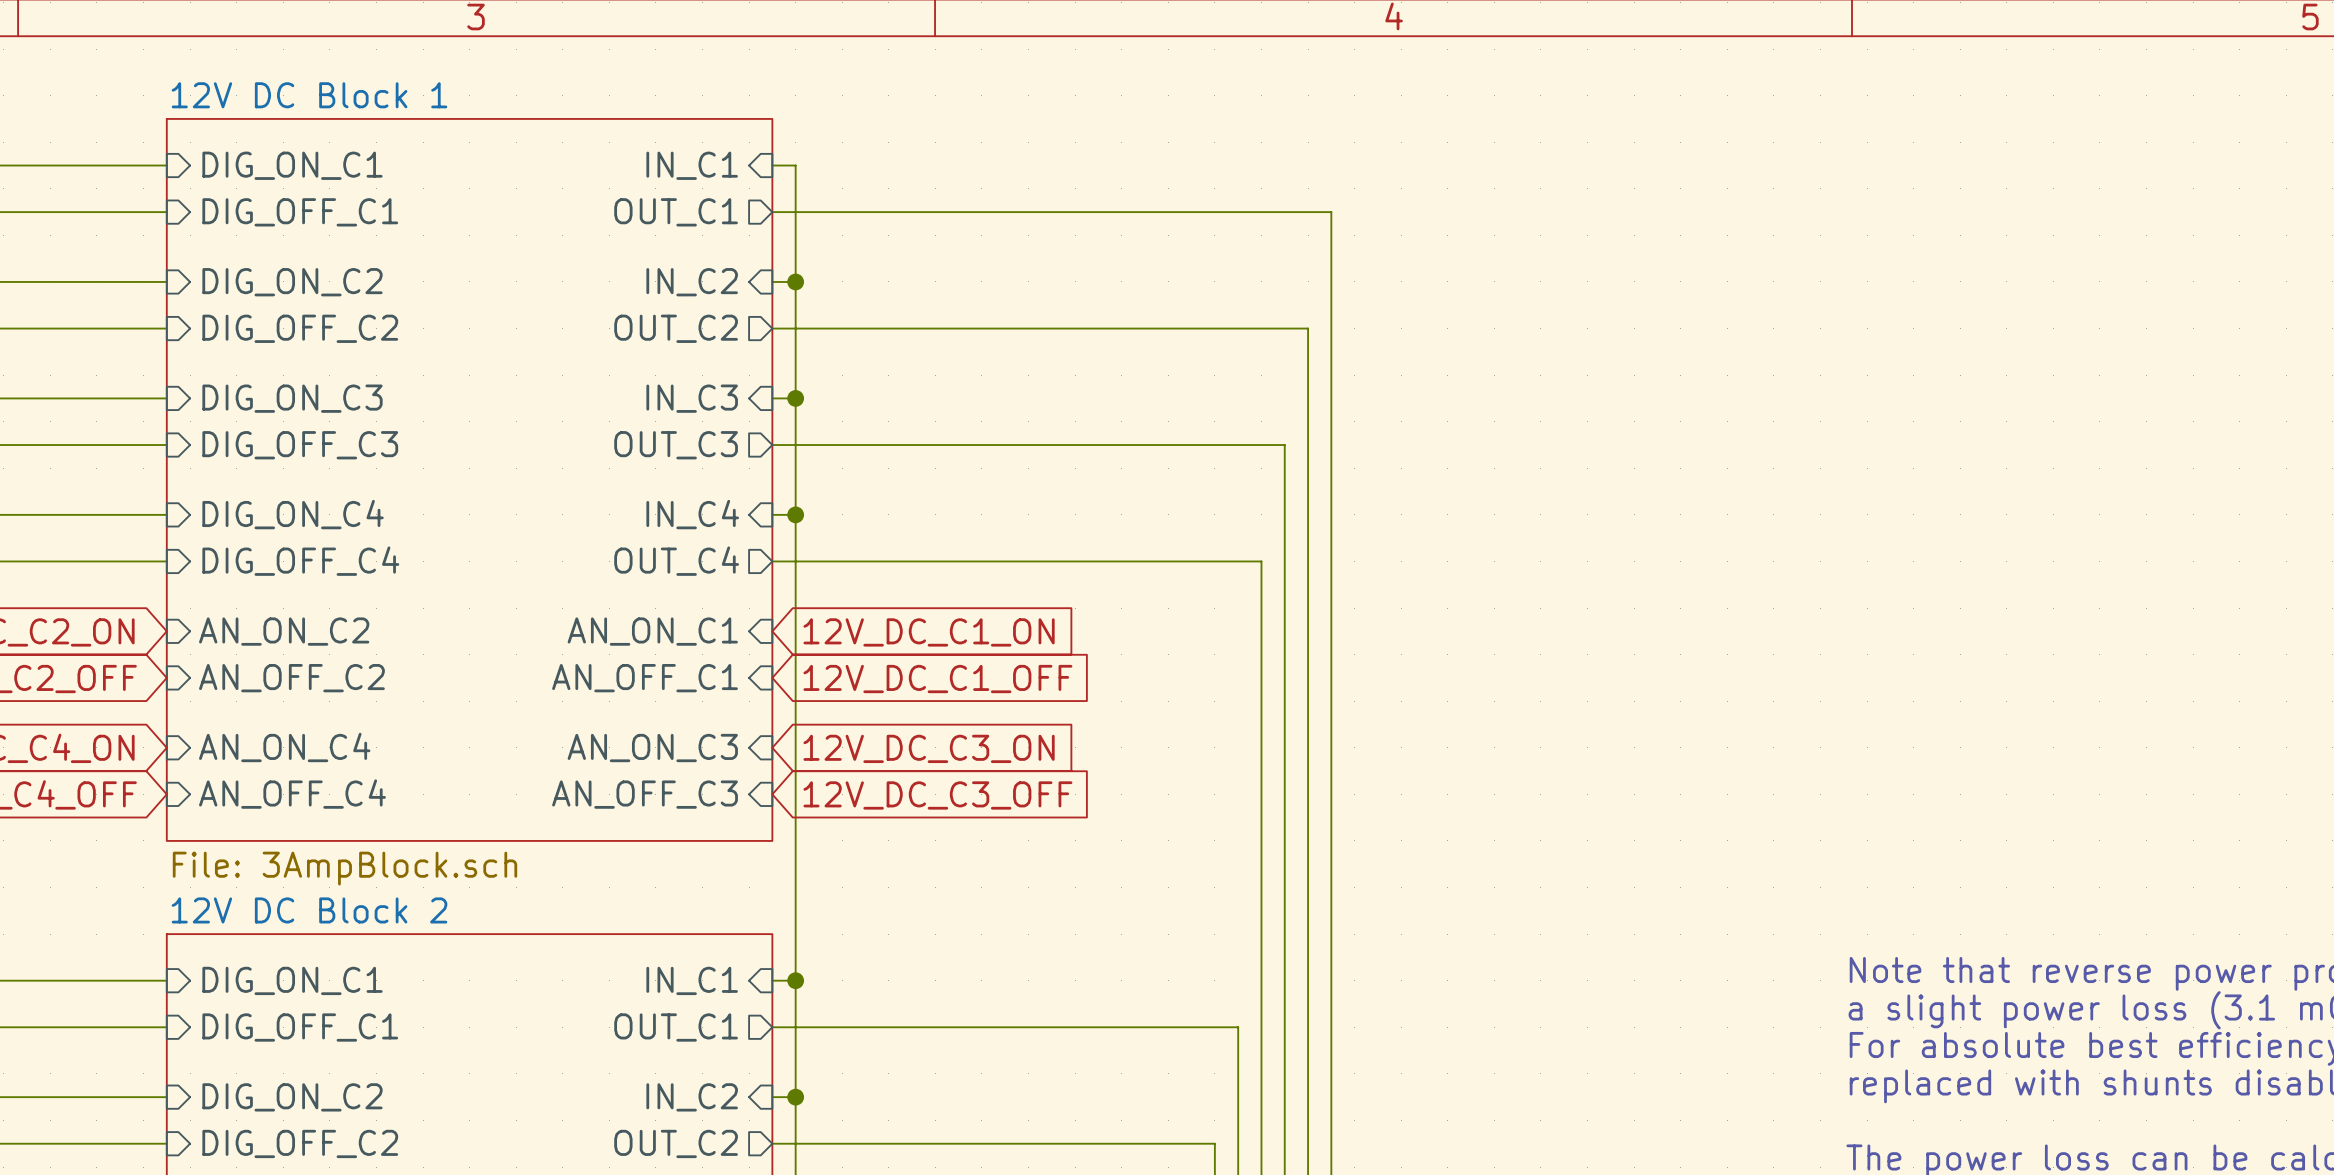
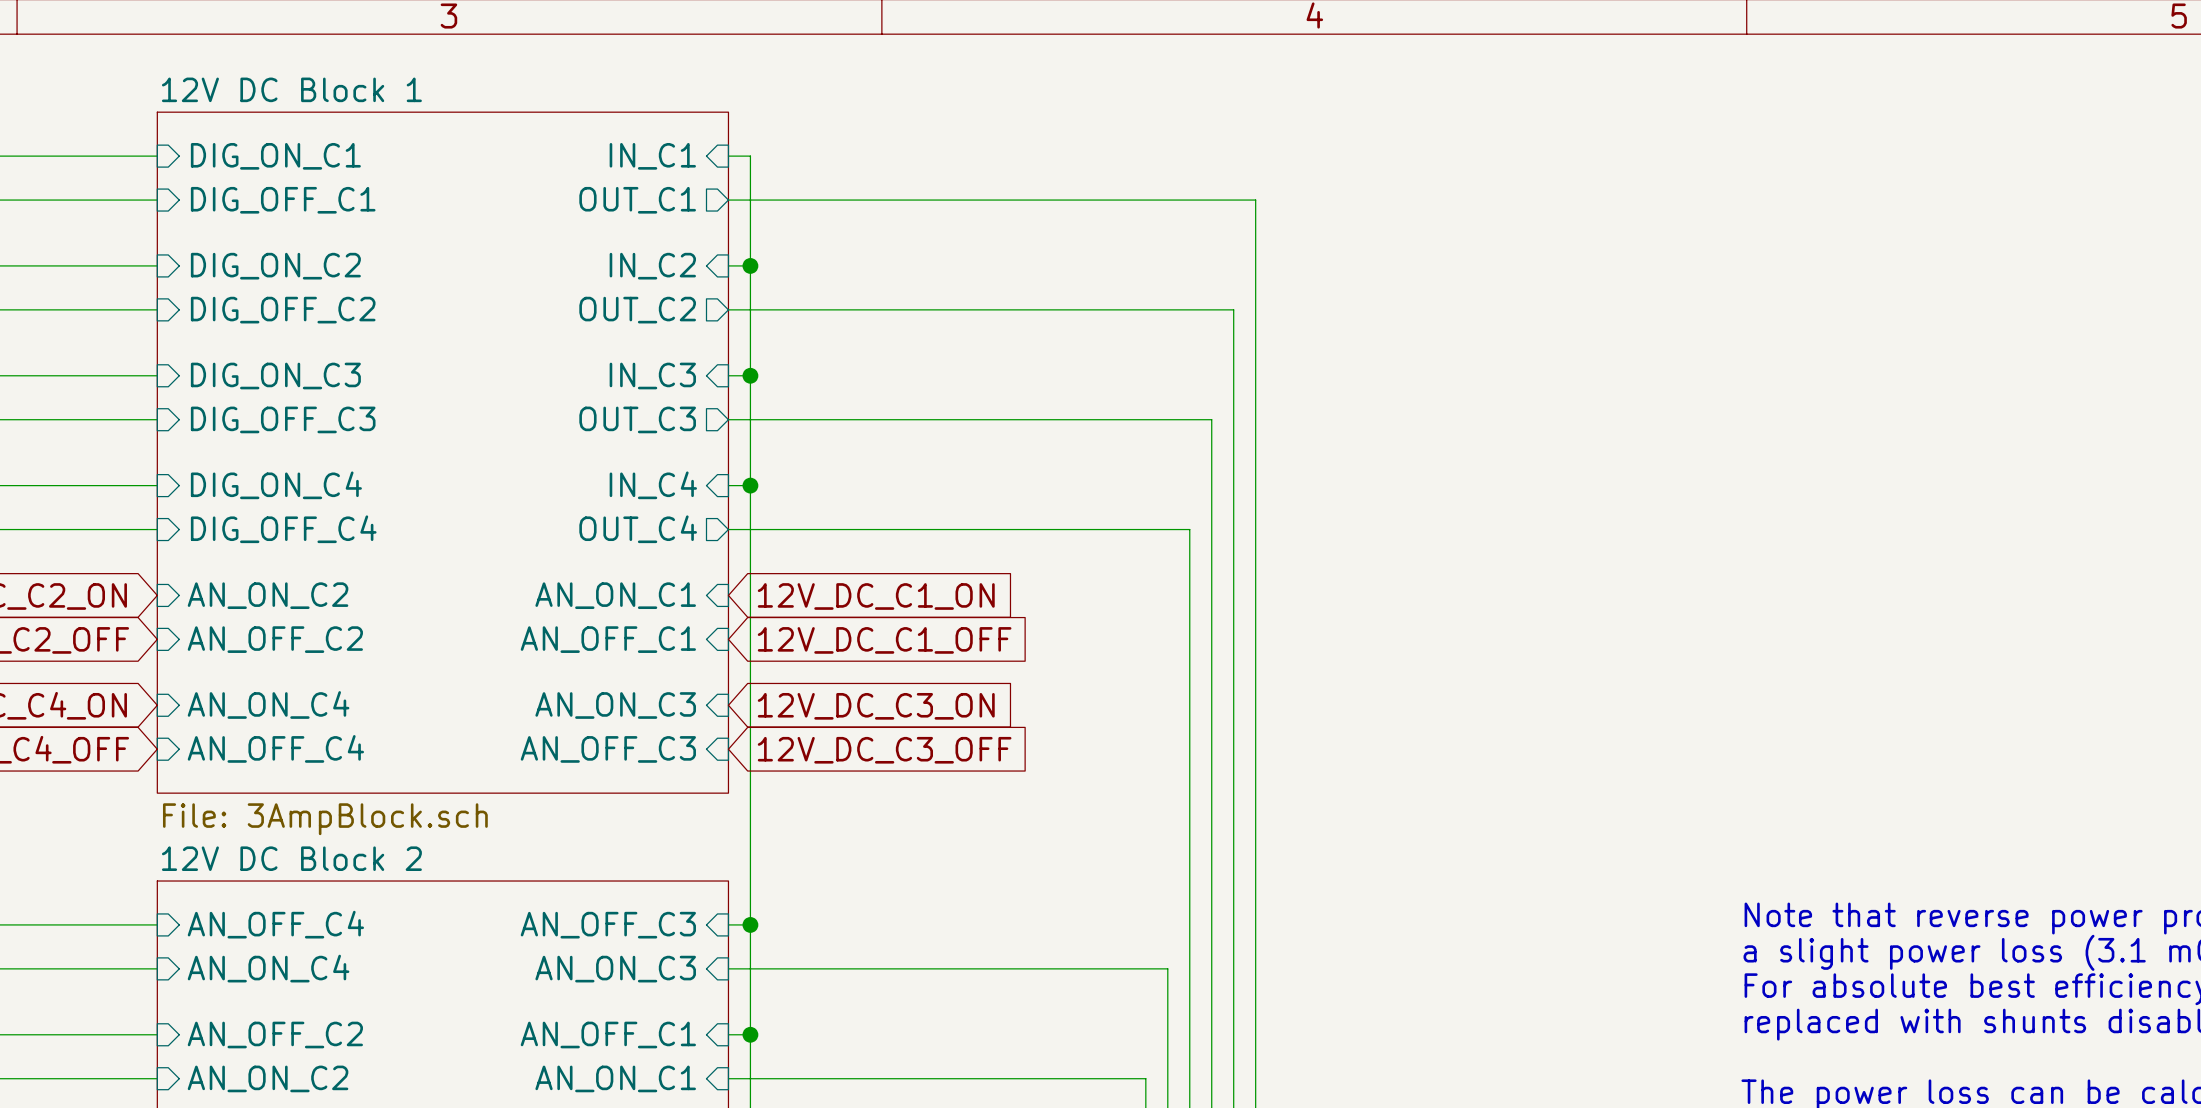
sheet pin: DIG_ON_C1 (292, 980) -> AN_OFF_C4 (275, 924)
sheet pin: IN_C1 (692, 980) -> AN_OFF_C3 (608, 925)
sheet pin: DIG_OFF_C1 (300, 1027) -> AN_ON_C4 (268, 968)
sheet pin shape: output (676, 1027) -> input (615, 969)
sheet pin: OUT_C1 (676, 1027) -> AN_ON_C3 (615, 969)
sheet pin: DIG_ON_C2 (292, 1097) -> AN_OFF_C2 (275, 1035)
sheet pin: IN_C2 (692, 1097) -> AN_OFF_C1 (608, 1035)
sheet pin: DIG_OFF_C2 (300, 1143) -> AN_ON_C2 (268, 1078)
sheet pin shape: output (676, 1143) -> input (615, 1078)
sheet pin: OUT_C2 (676, 1143) -> AN_ON_C1 (615, 1078)

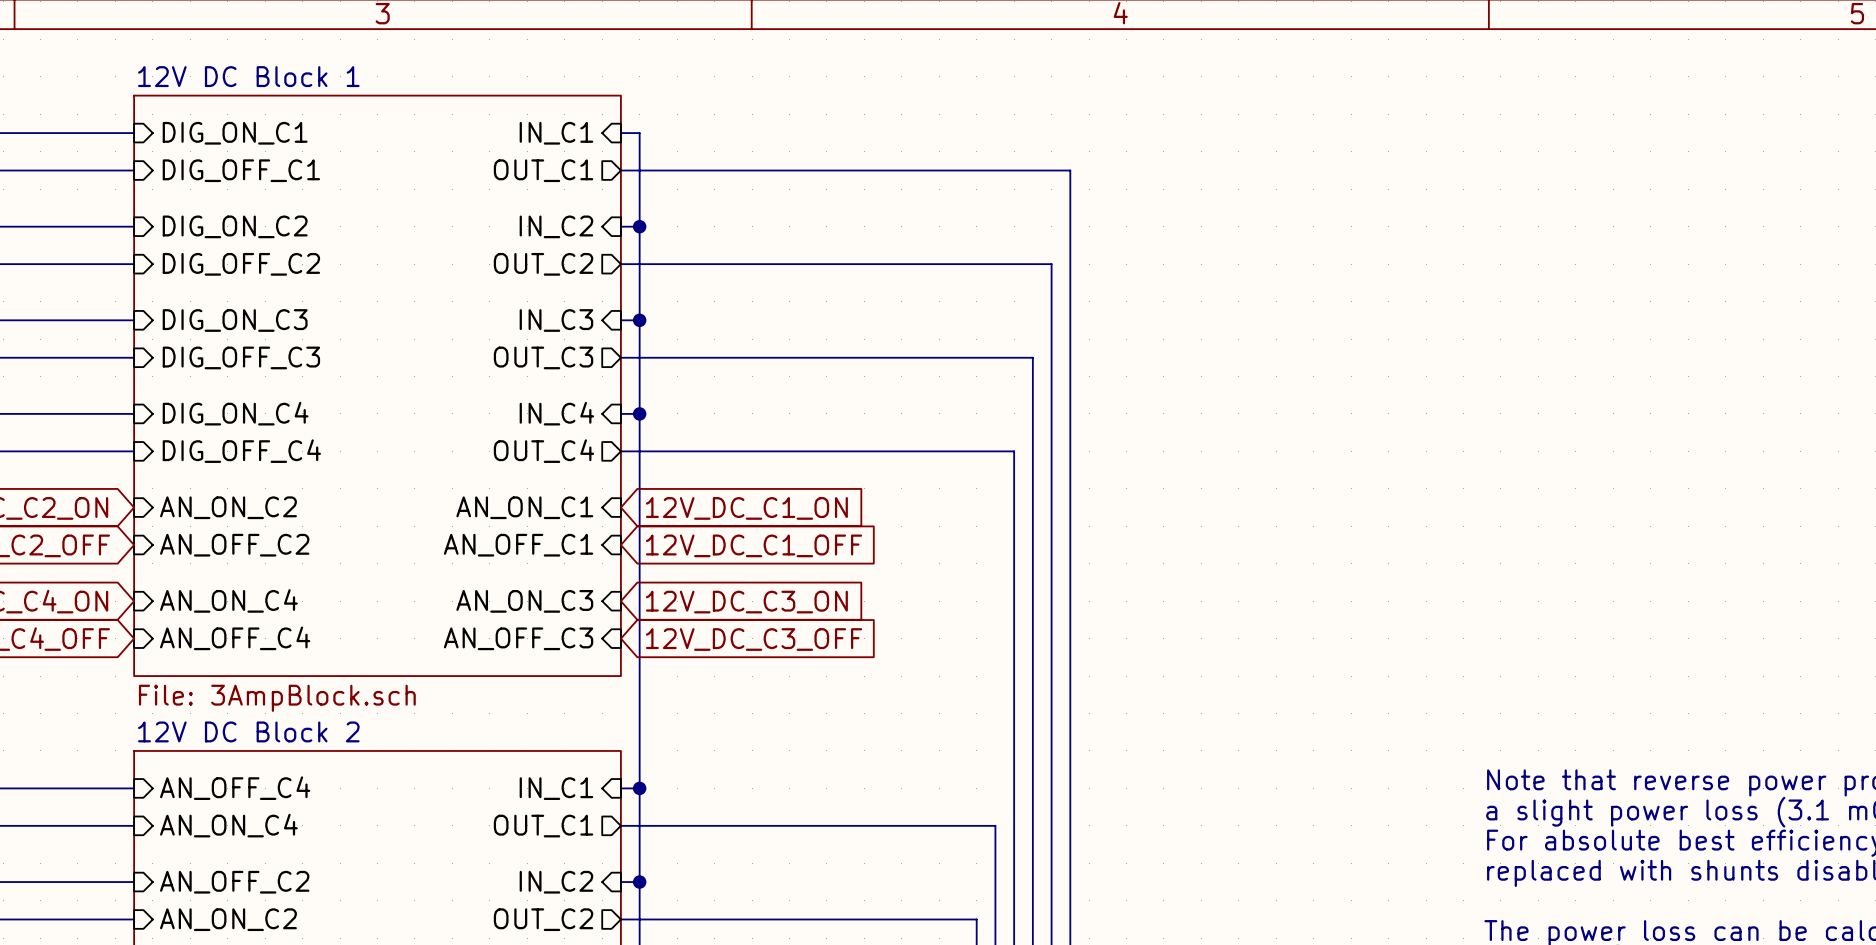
sheet pin: AN_OFF_C3 (608, 925) -> IN_C1 (556, 788)
sheet pin shape: input (615, 969) -> output (543, 826)
sheet pin: AN_ON_C3 (615, 969) -> OUT_C1 (543, 826)
sheet pin: AN_OFF_C1 (608, 1035) -> IN_C2 (556, 882)
sheet pin shape: input (615, 1078) -> output (543, 919)
sheet pin: AN_ON_C1 (615, 1078) -> OUT_C2 (543, 919)

